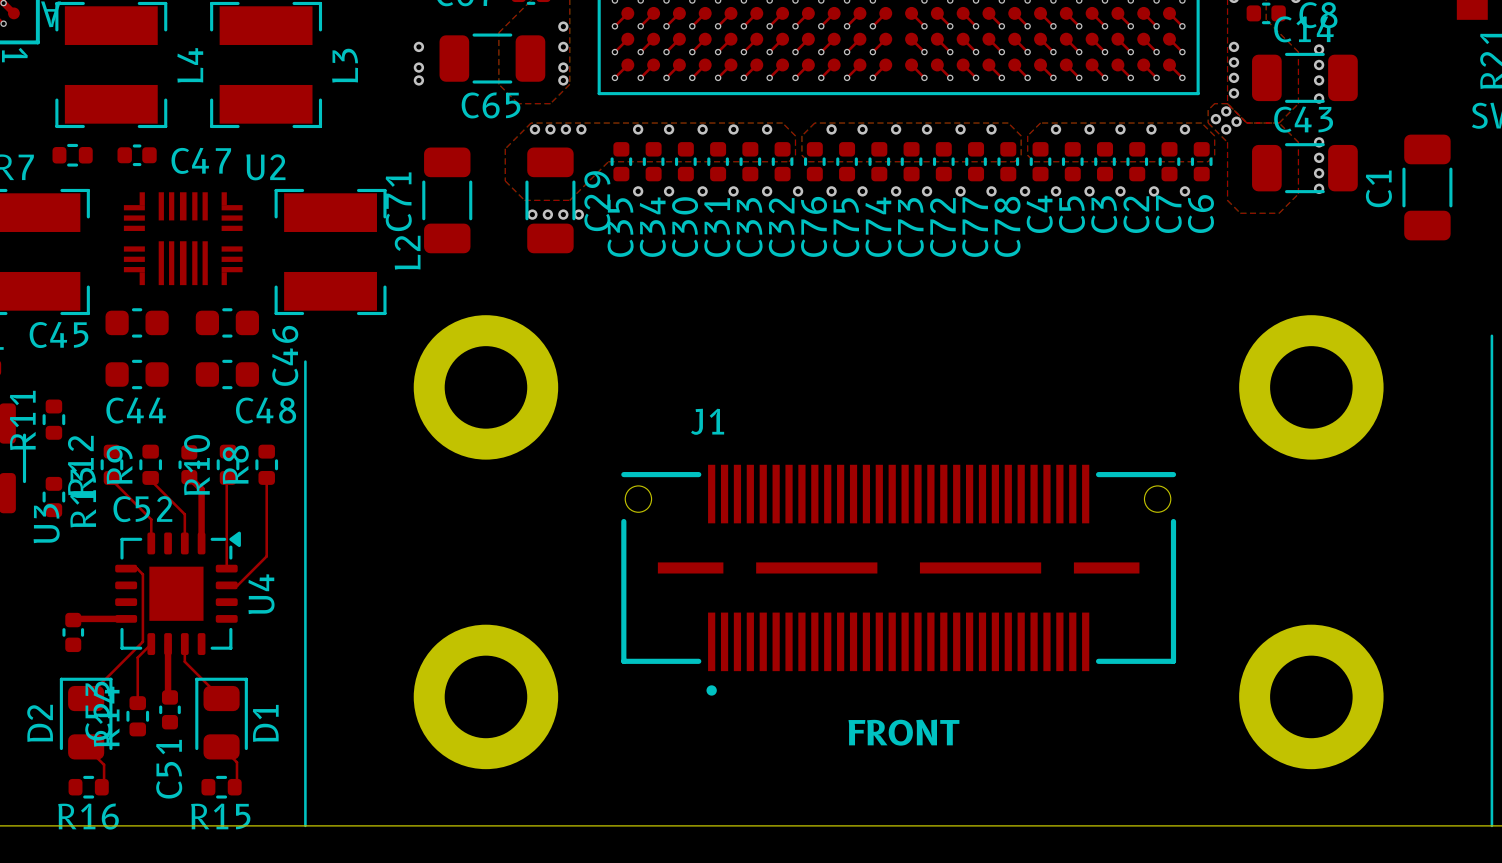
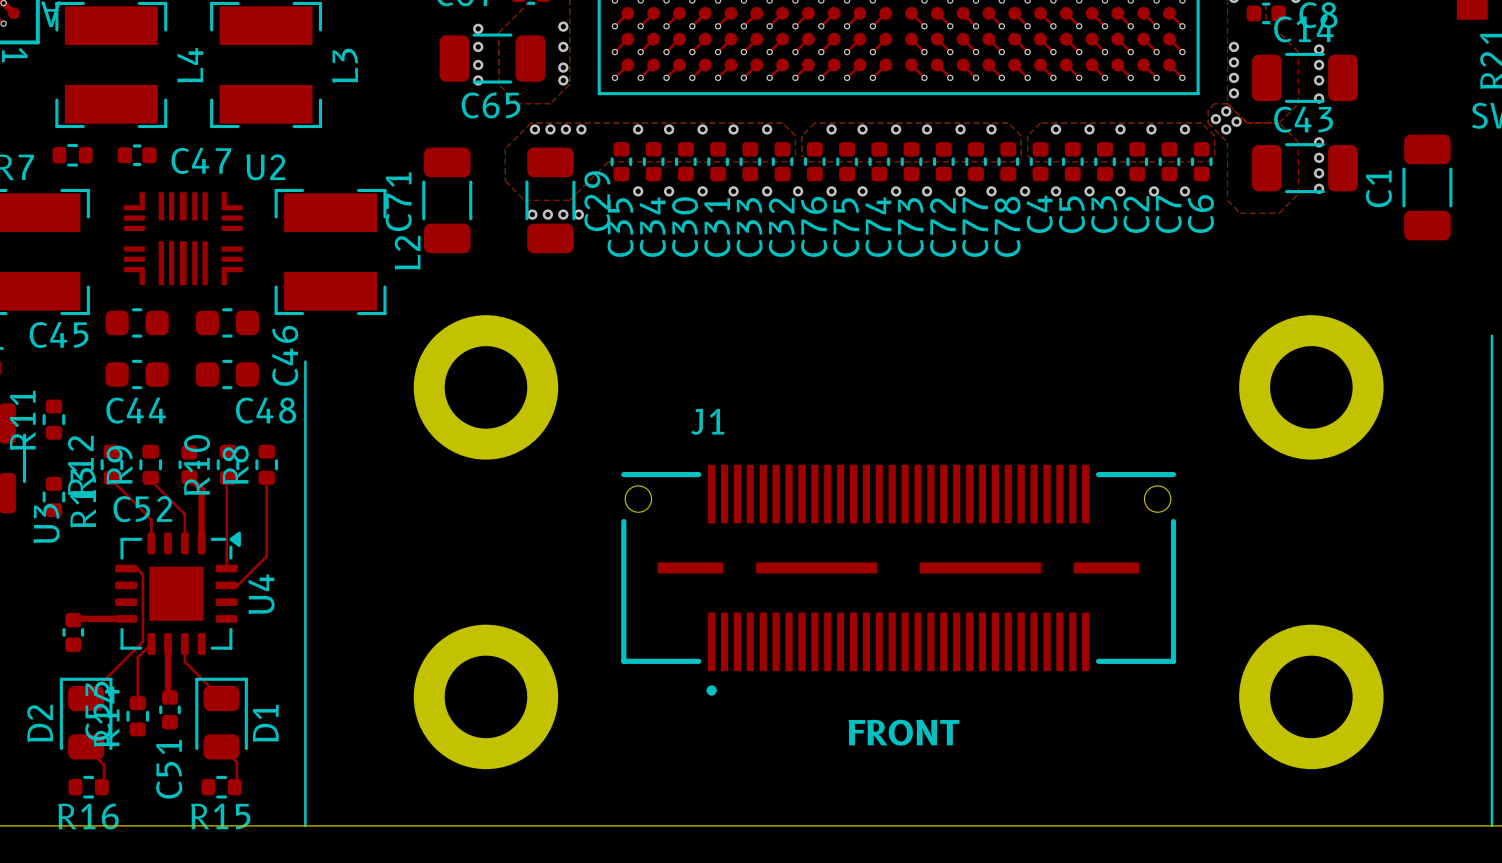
via: none -> (478, 28)
via: (418, 46) -> none
via: none -> (478, 46)
via: none -> (478, 64)
via: (418, 67) -> none
via: (418, 80) -> none
via: none -> (478, 80)

